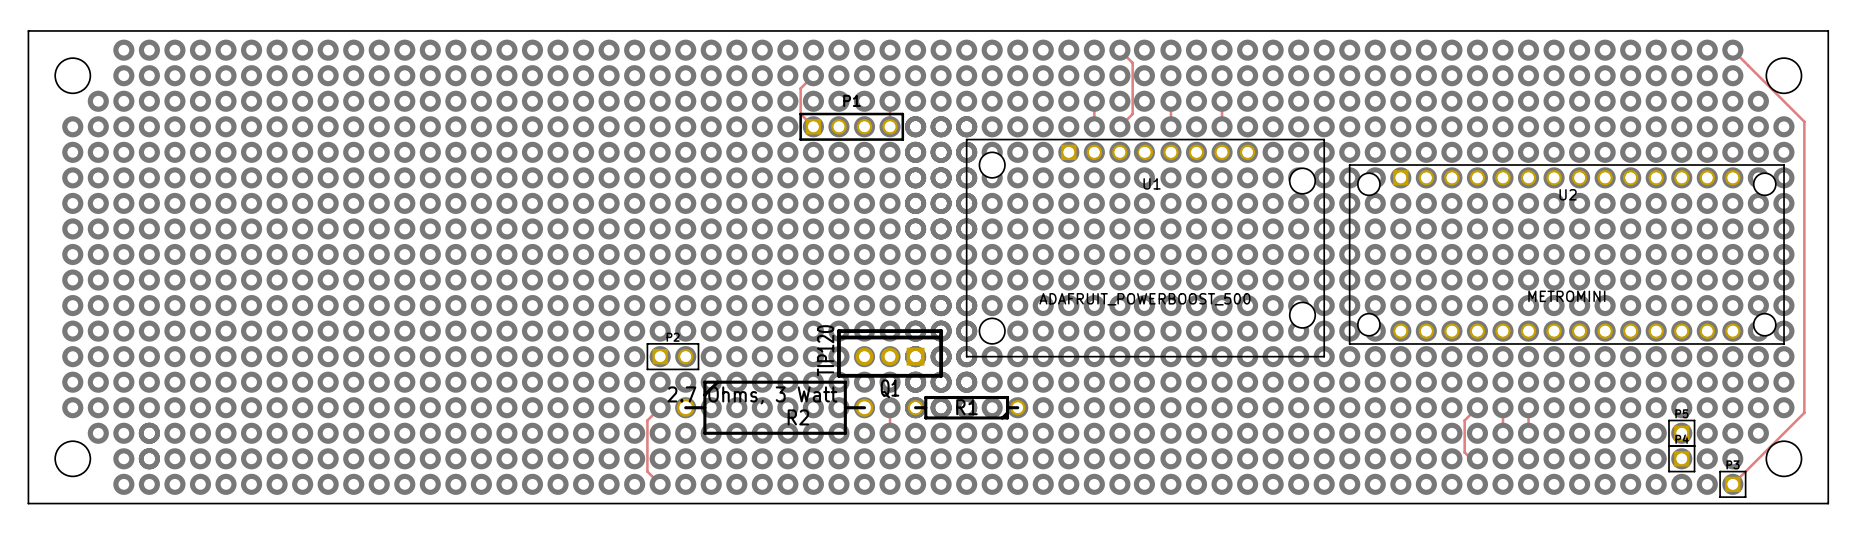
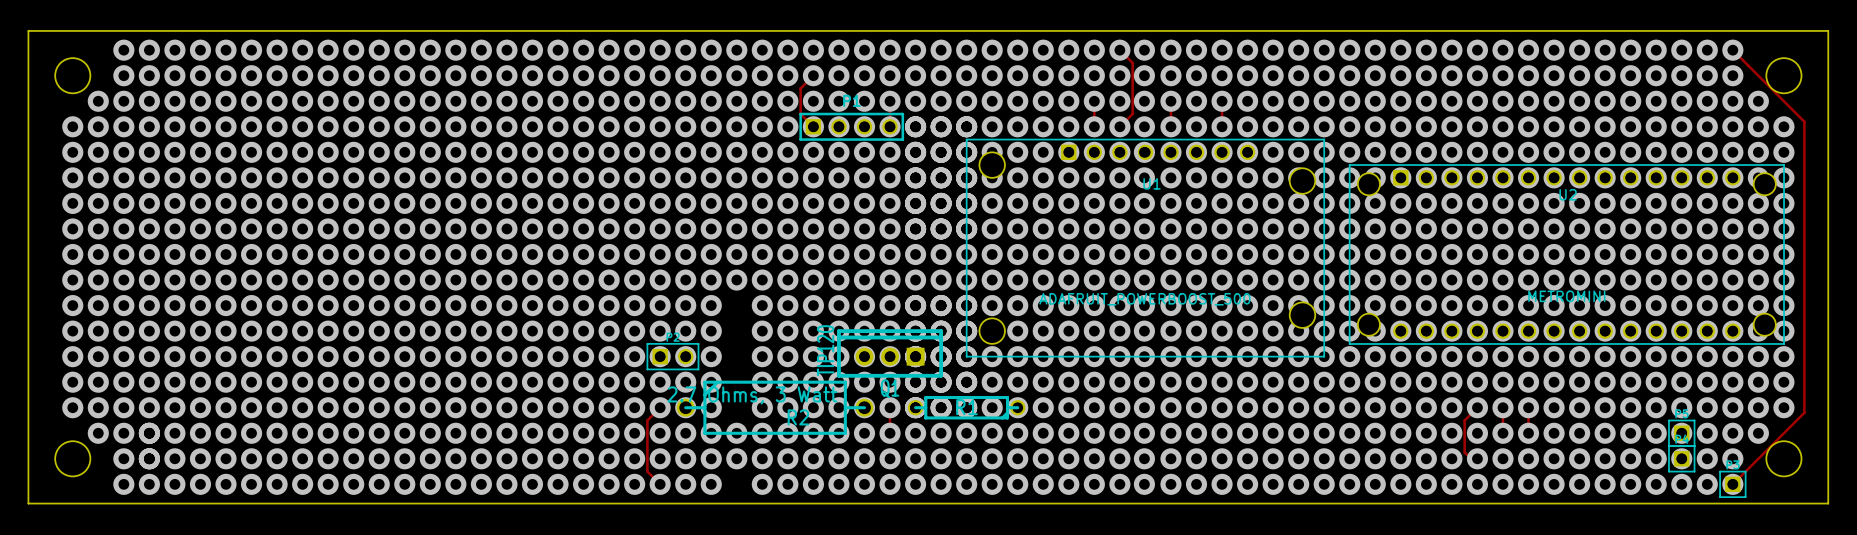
via: (736, 305) -> none
via: (736, 331) -> none
via: (736, 356) -> none
via: (736, 382) -> none
via: (736, 407) -> none
via: (736, 484) -> none

